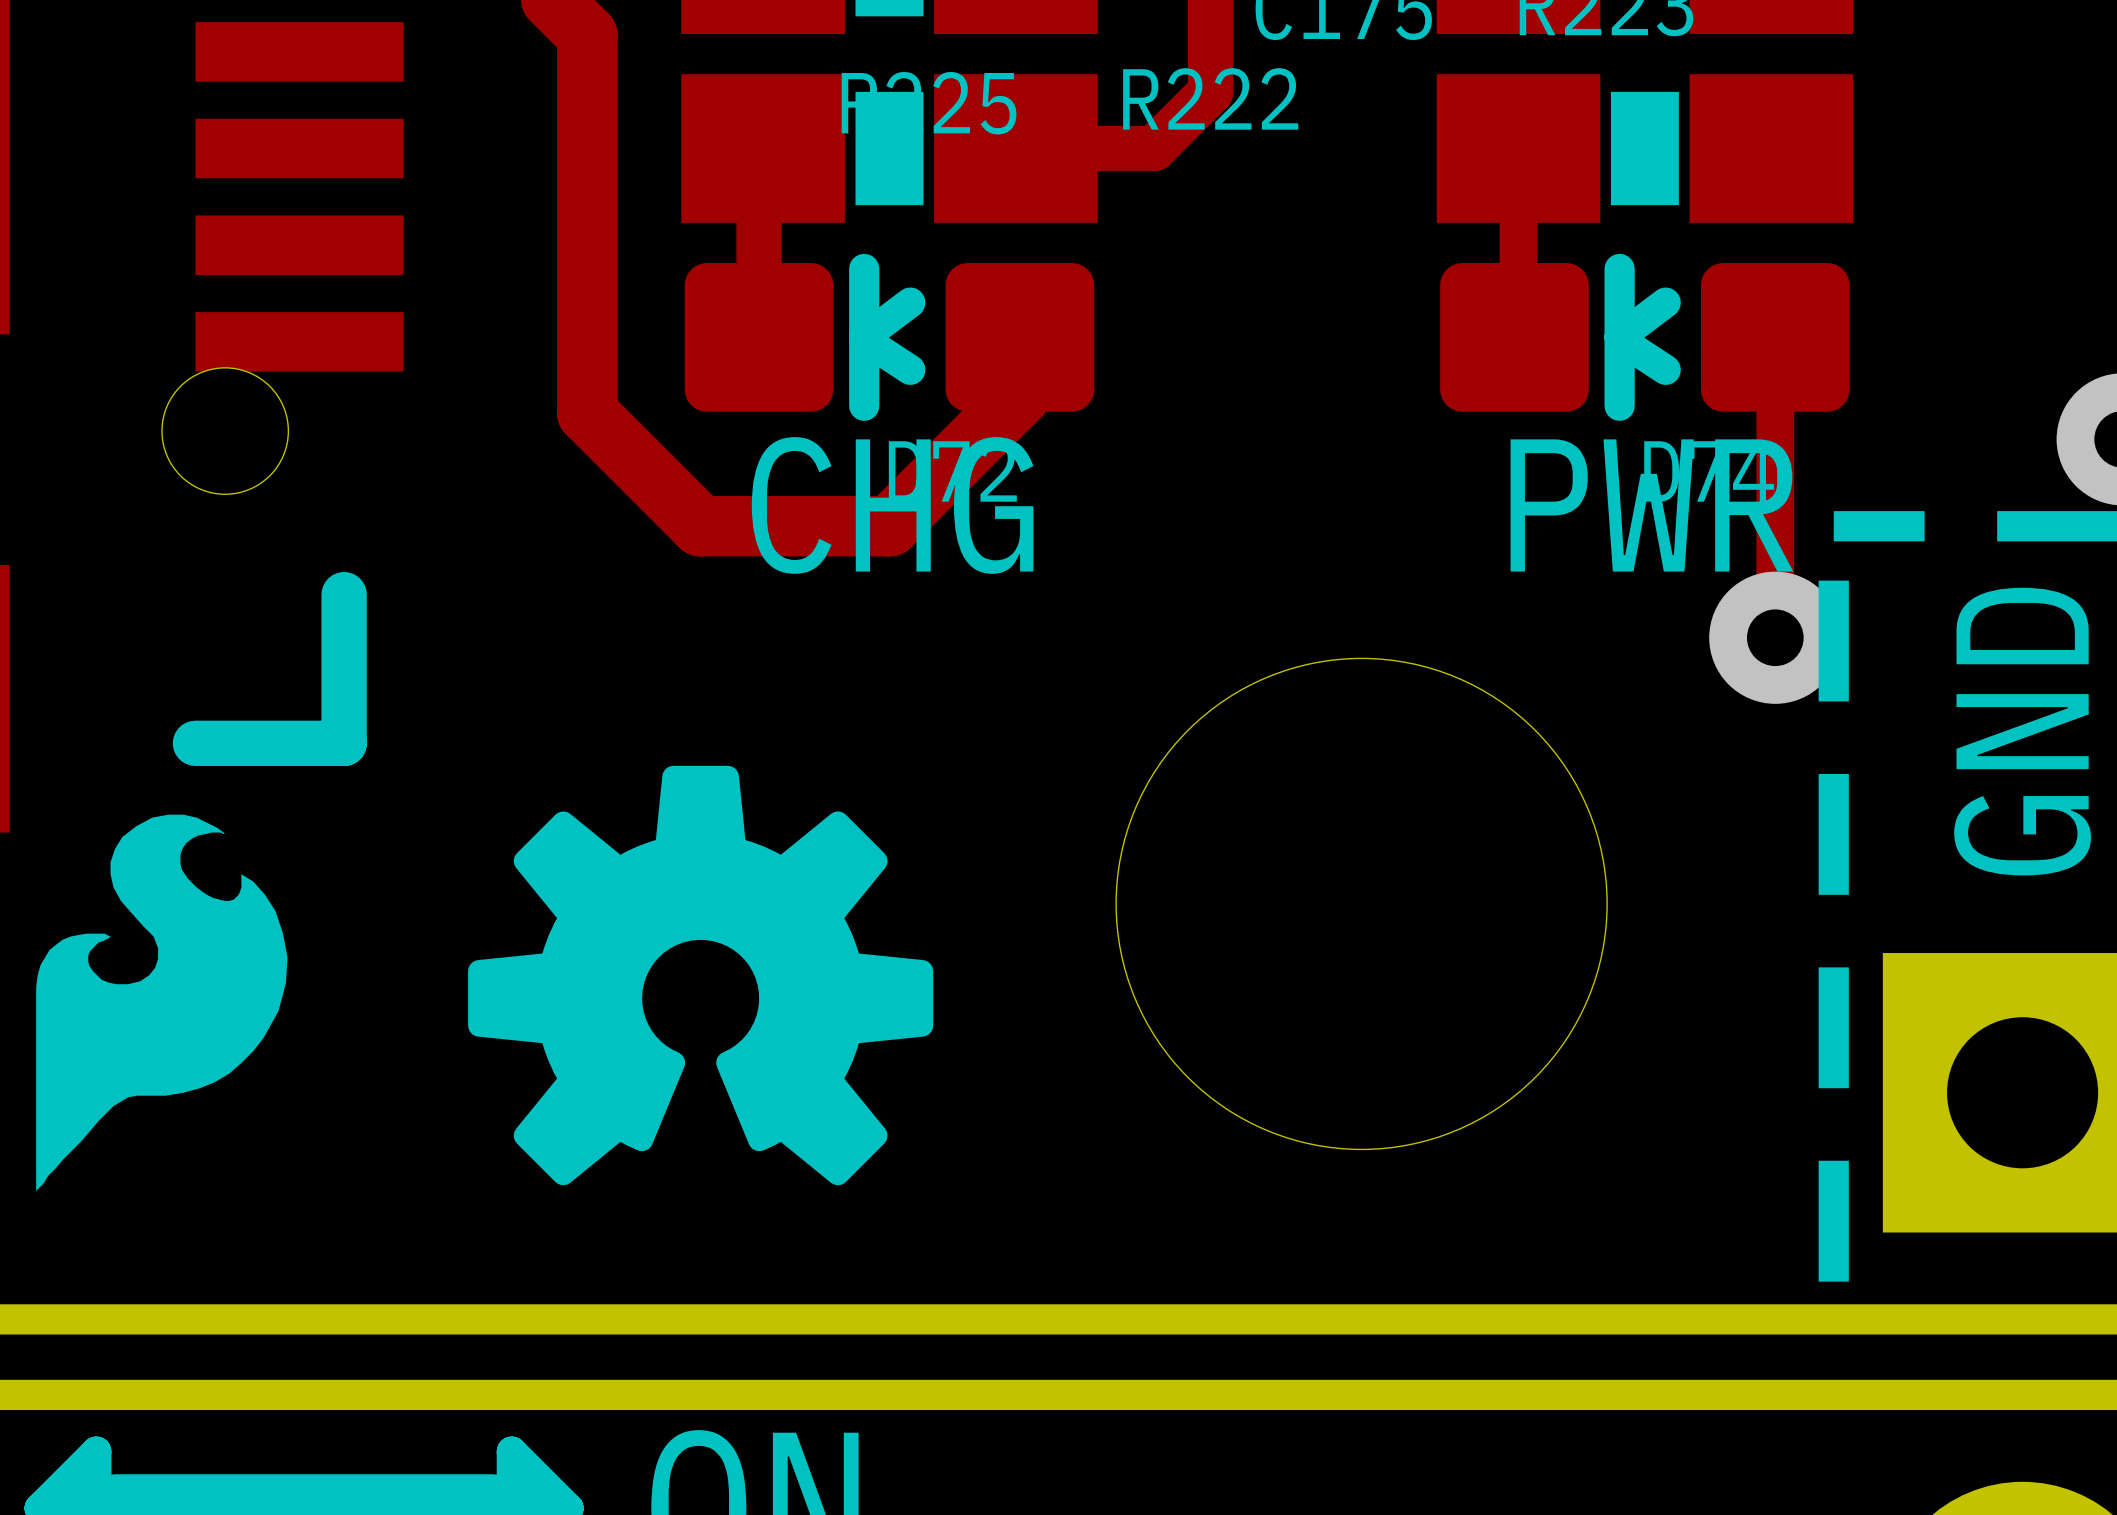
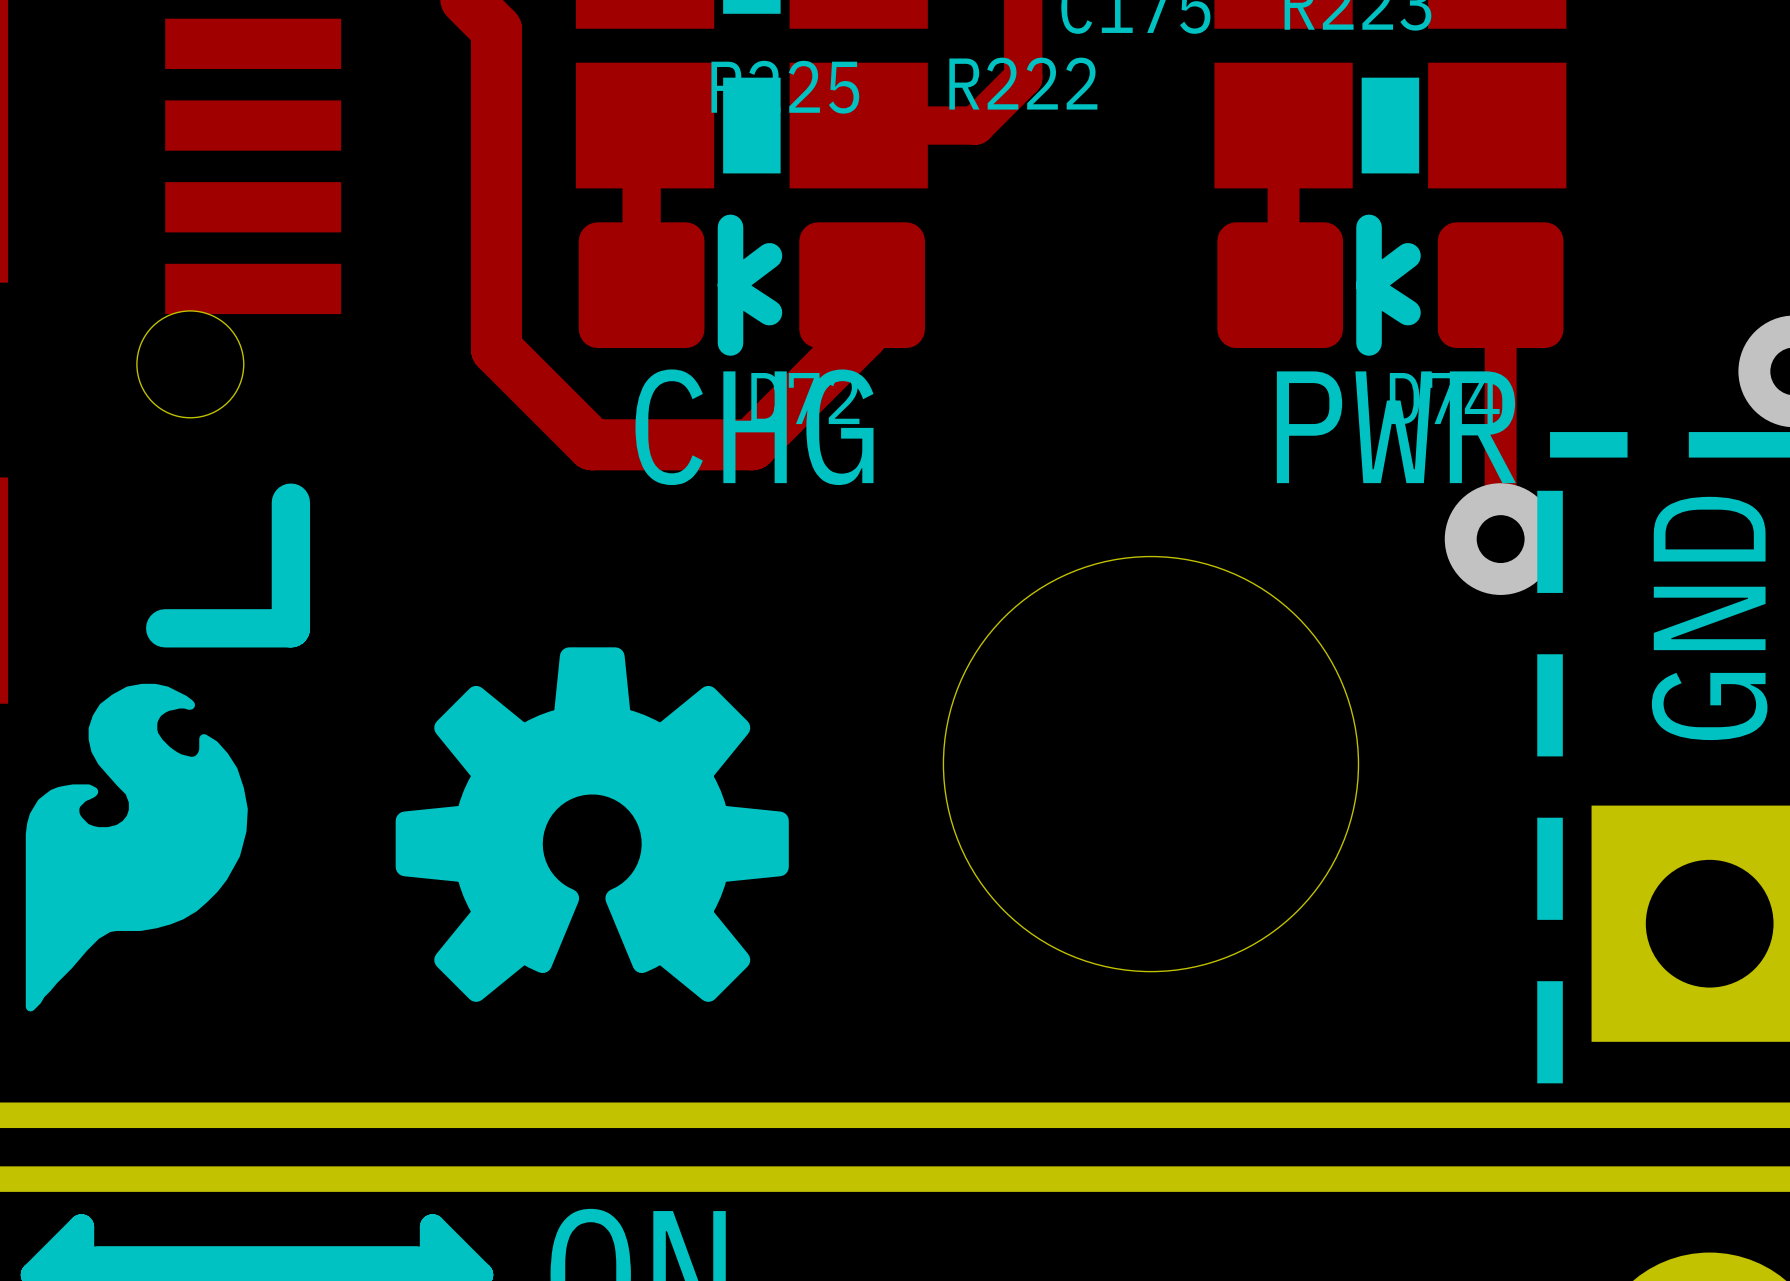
drawing shape: [36, 814, 288, 1193] -> [25, 683, 248, 1012]

